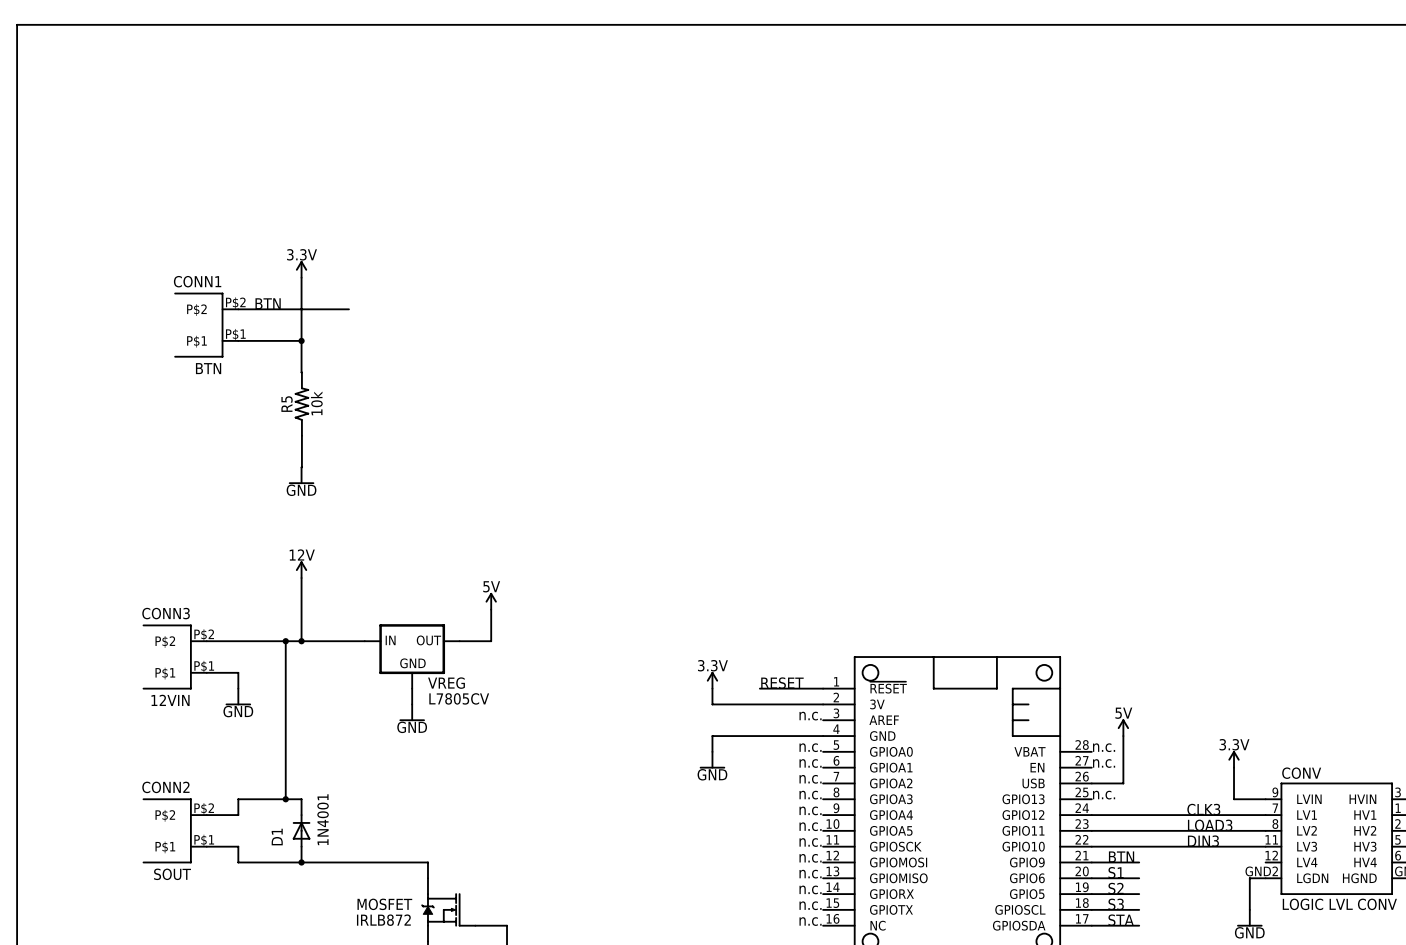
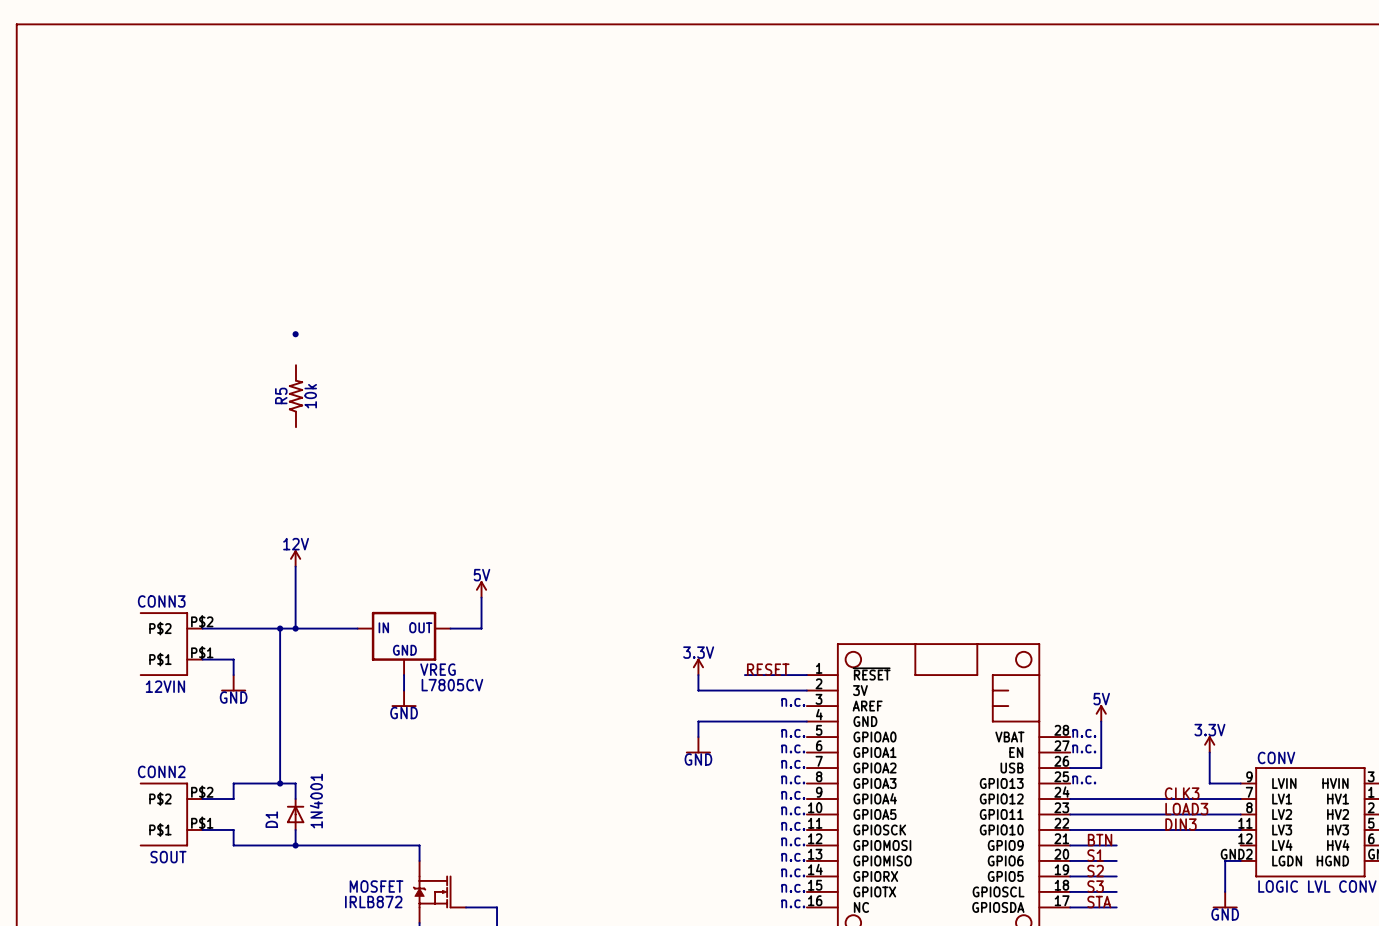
power symbol: 3.3V (301, 269) -> none
wire: (301, 277) (301, 372) -> none
label: BTN (268, 303) -> none
wire: (238, 309) (348, 309) -> none
BTN: CONN1 (206, 325) -> none
wire: (238, 340) (301, 340) -> none
wire: (301, 435) (301, 467) -> none
power symbol: GND (301, 475) -> none

